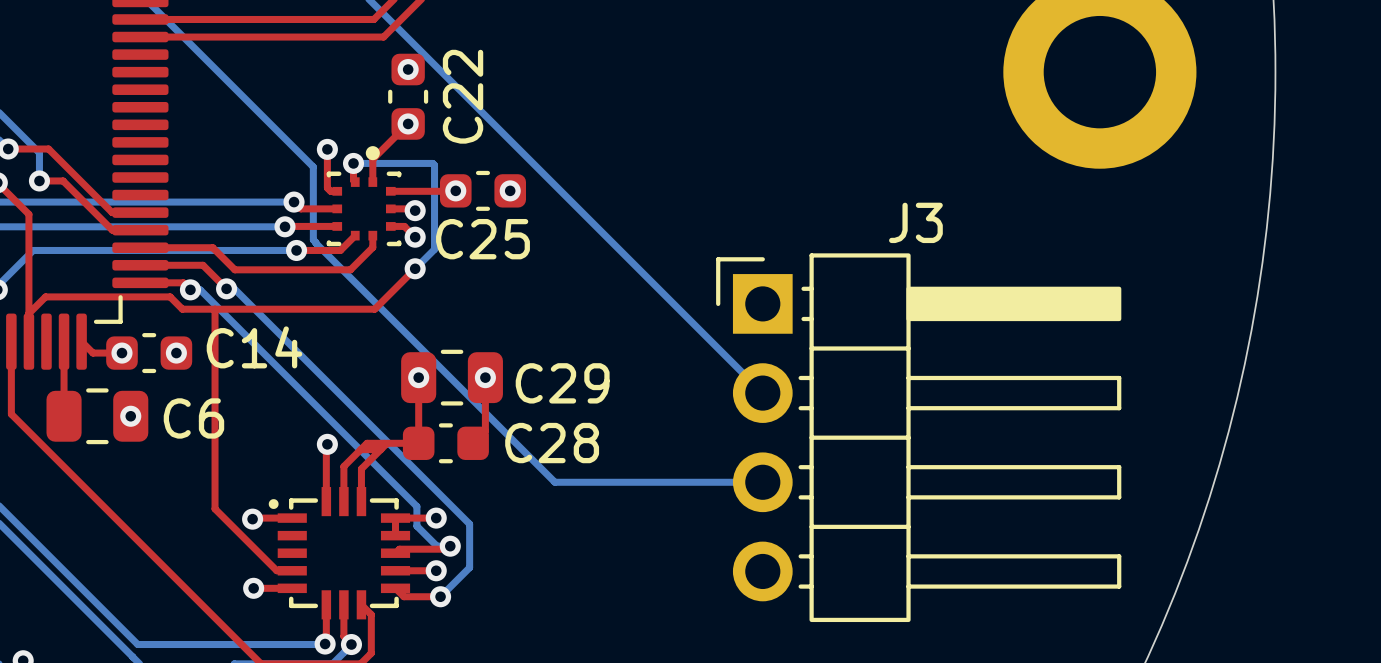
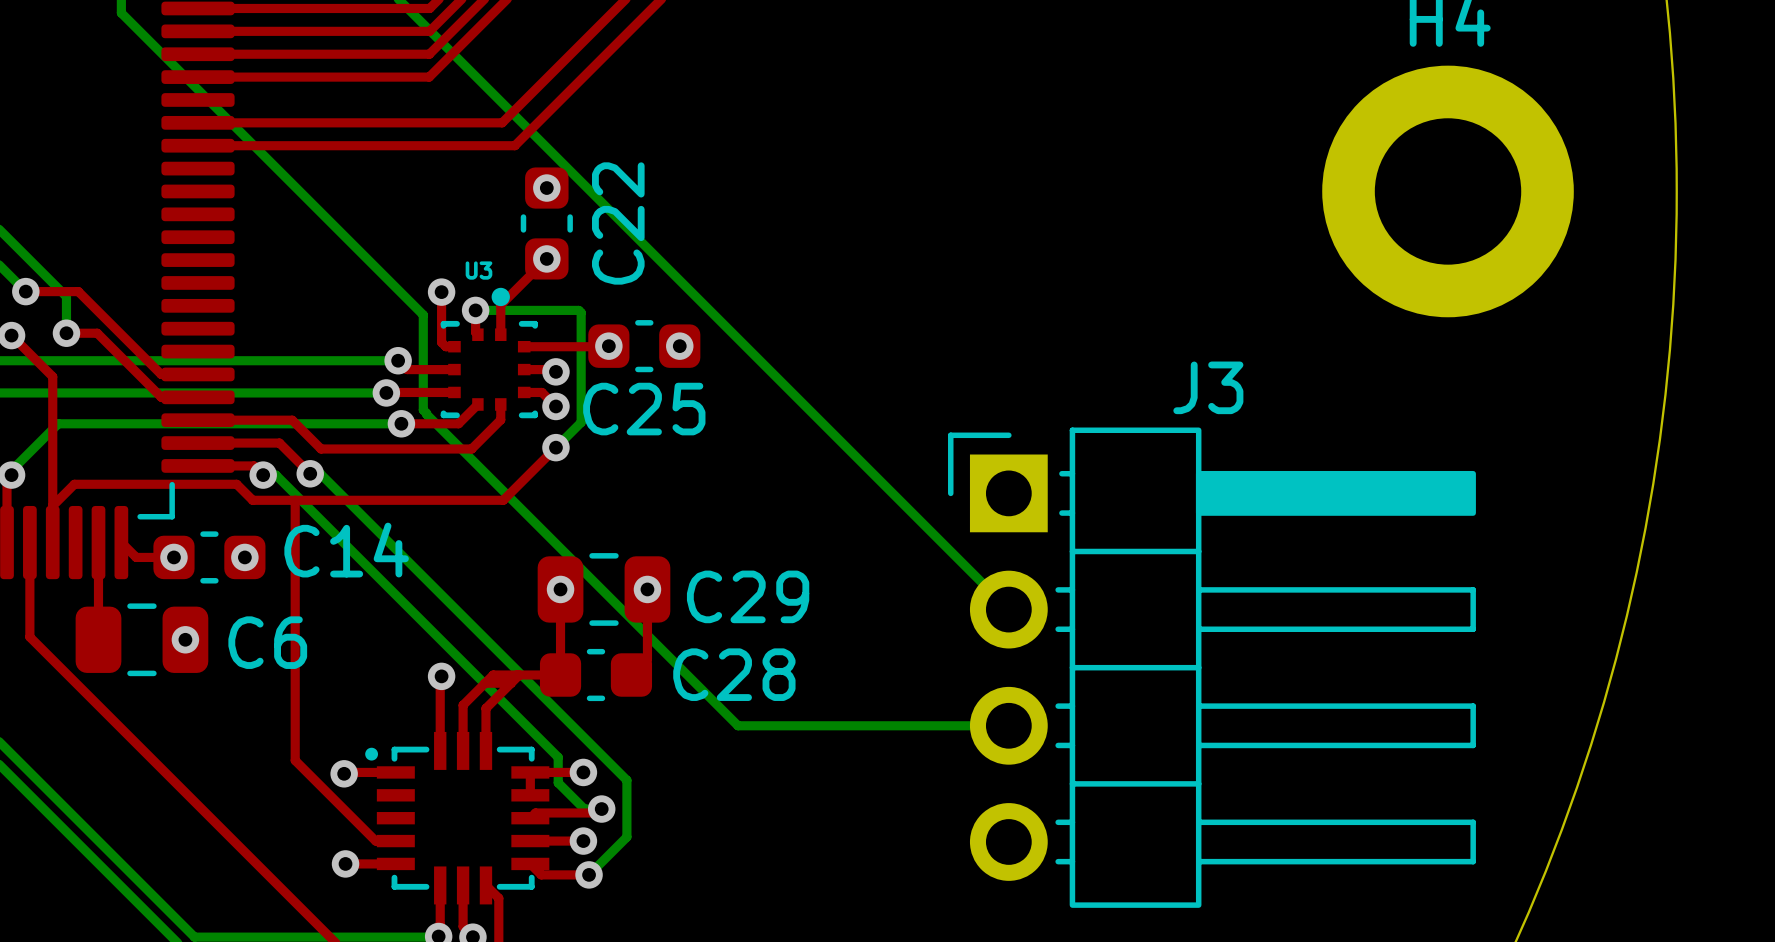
U3 name: none -> U3 (478, 270)

